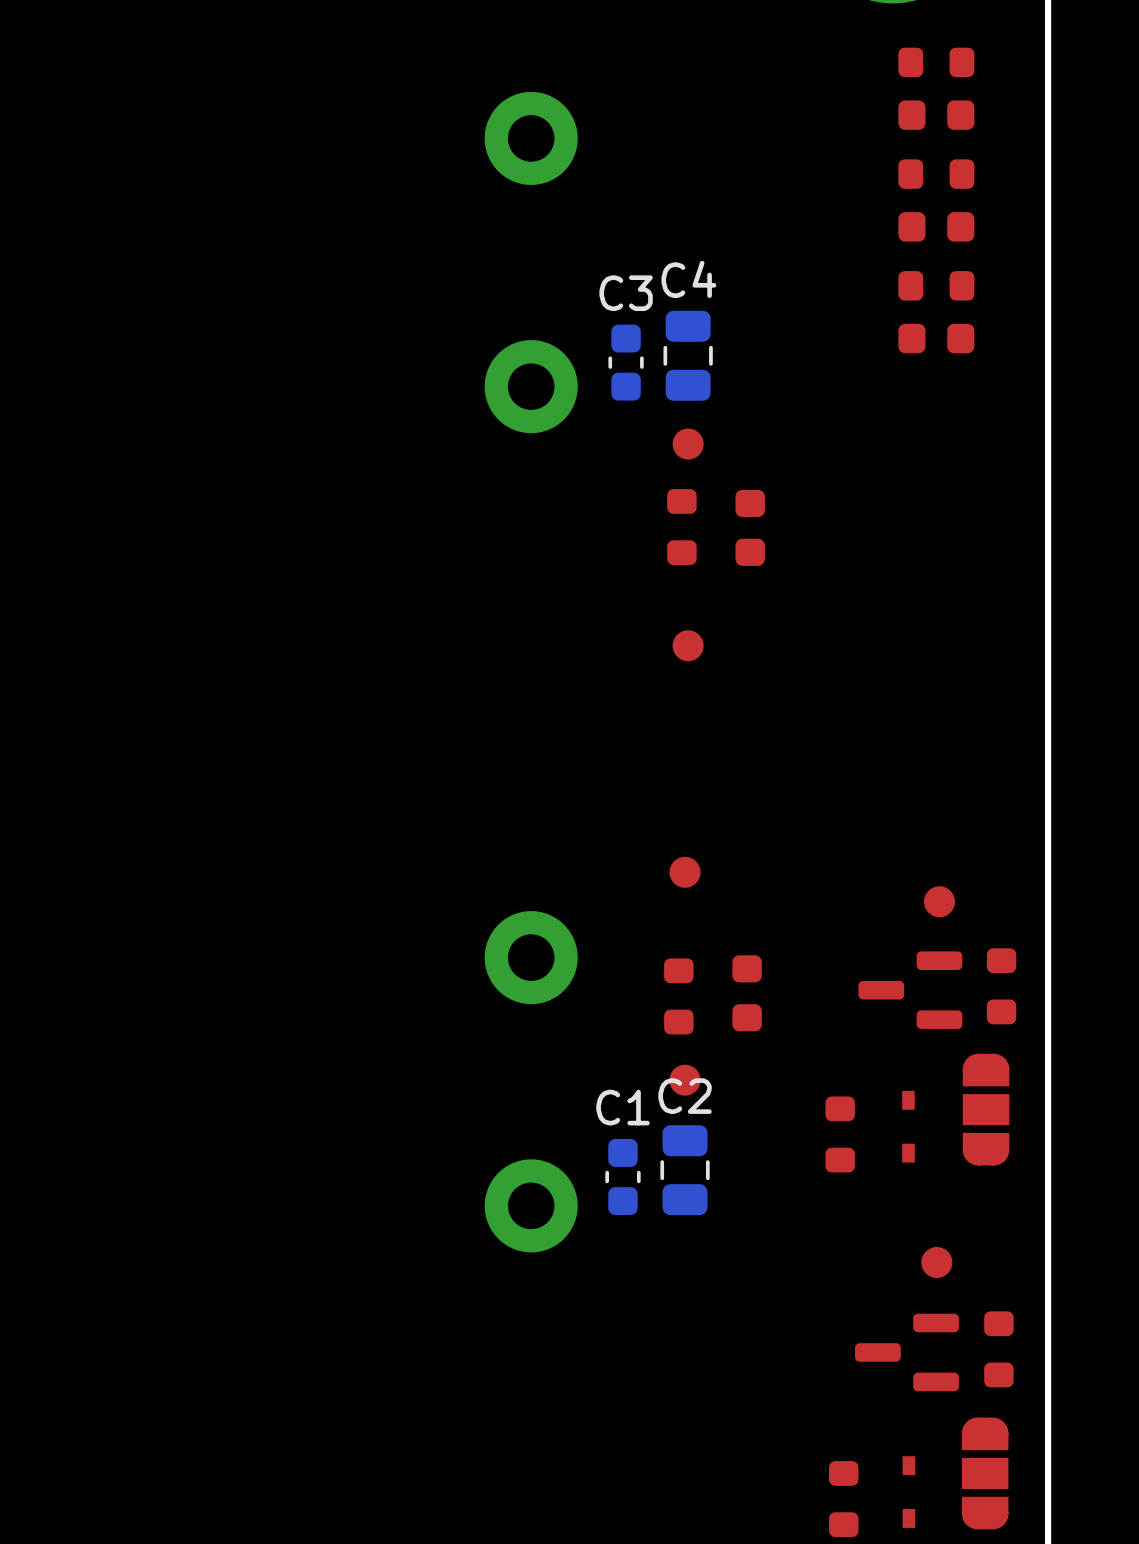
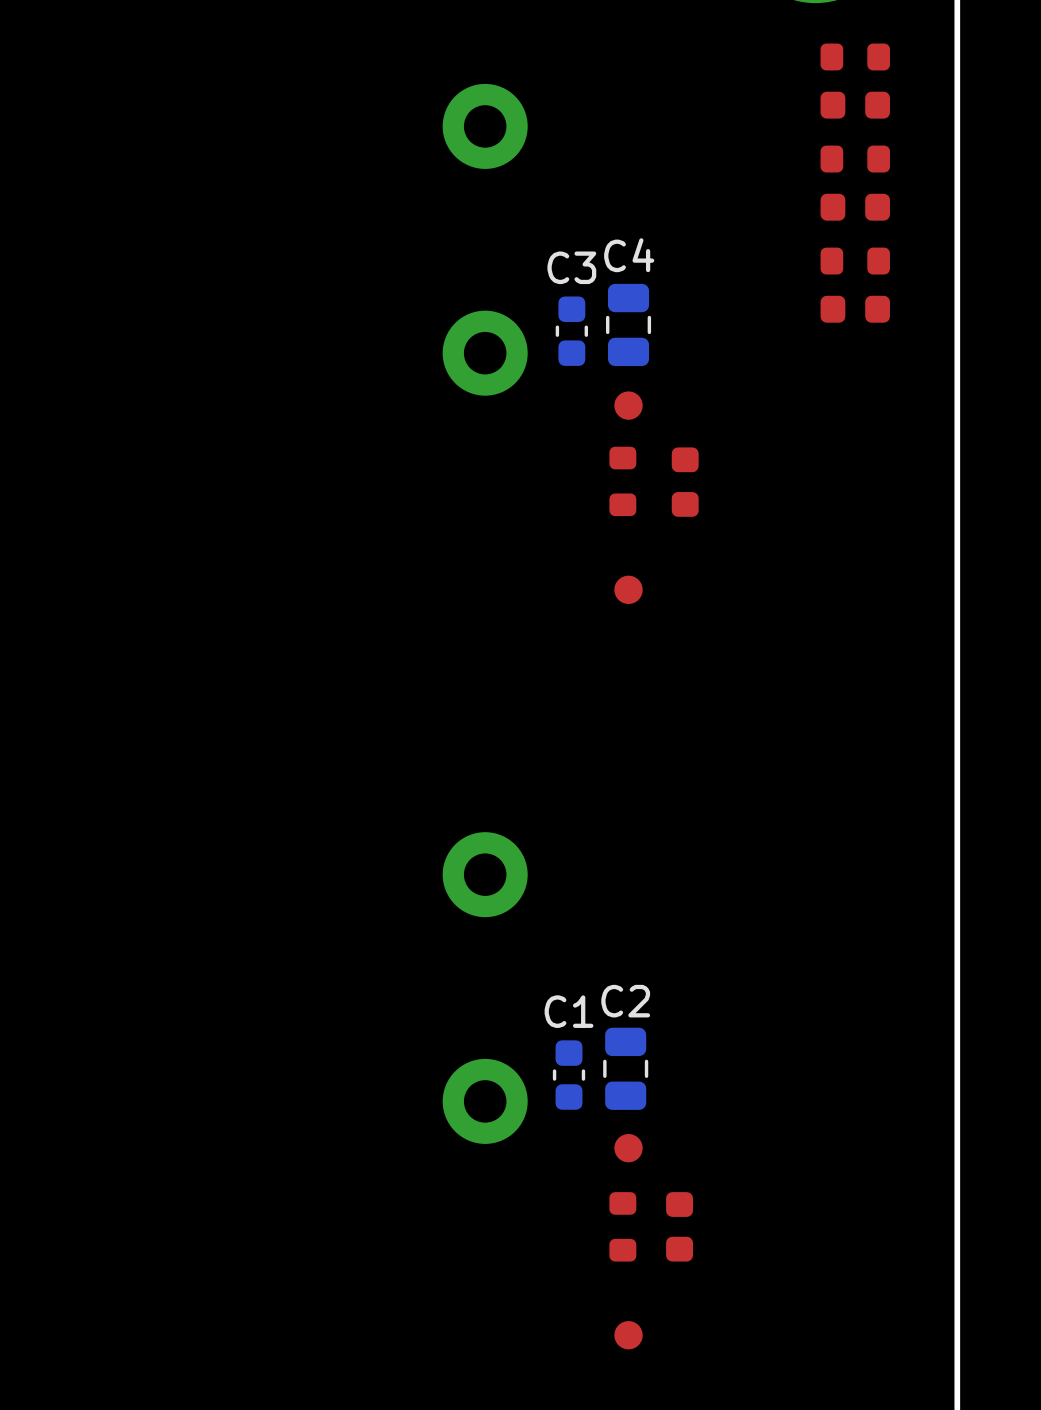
part: (685, 872) -> none
part: (939, 901) -> none
part: (1001, 986) -> none
part: (910, 990) -> none
part position: (747, 993) -> (679, 1226)
part: (678, 996) -> none
part: (685, 1080) -> none
part: (986, 1109) -> none
part: (908, 1126) -> none
part: (840, 1134) -> none
part: none -> (628, 1148)
part: (936, 1262) -> none
part: none -> (622, 1226)
part: (998, 1349) -> none
part: (906, 1352) -> none
part: none -> (628, 1335)
part: (985, 1473) -> none
part: (908, 1492) -> none
part: (843, 1499) -> none

